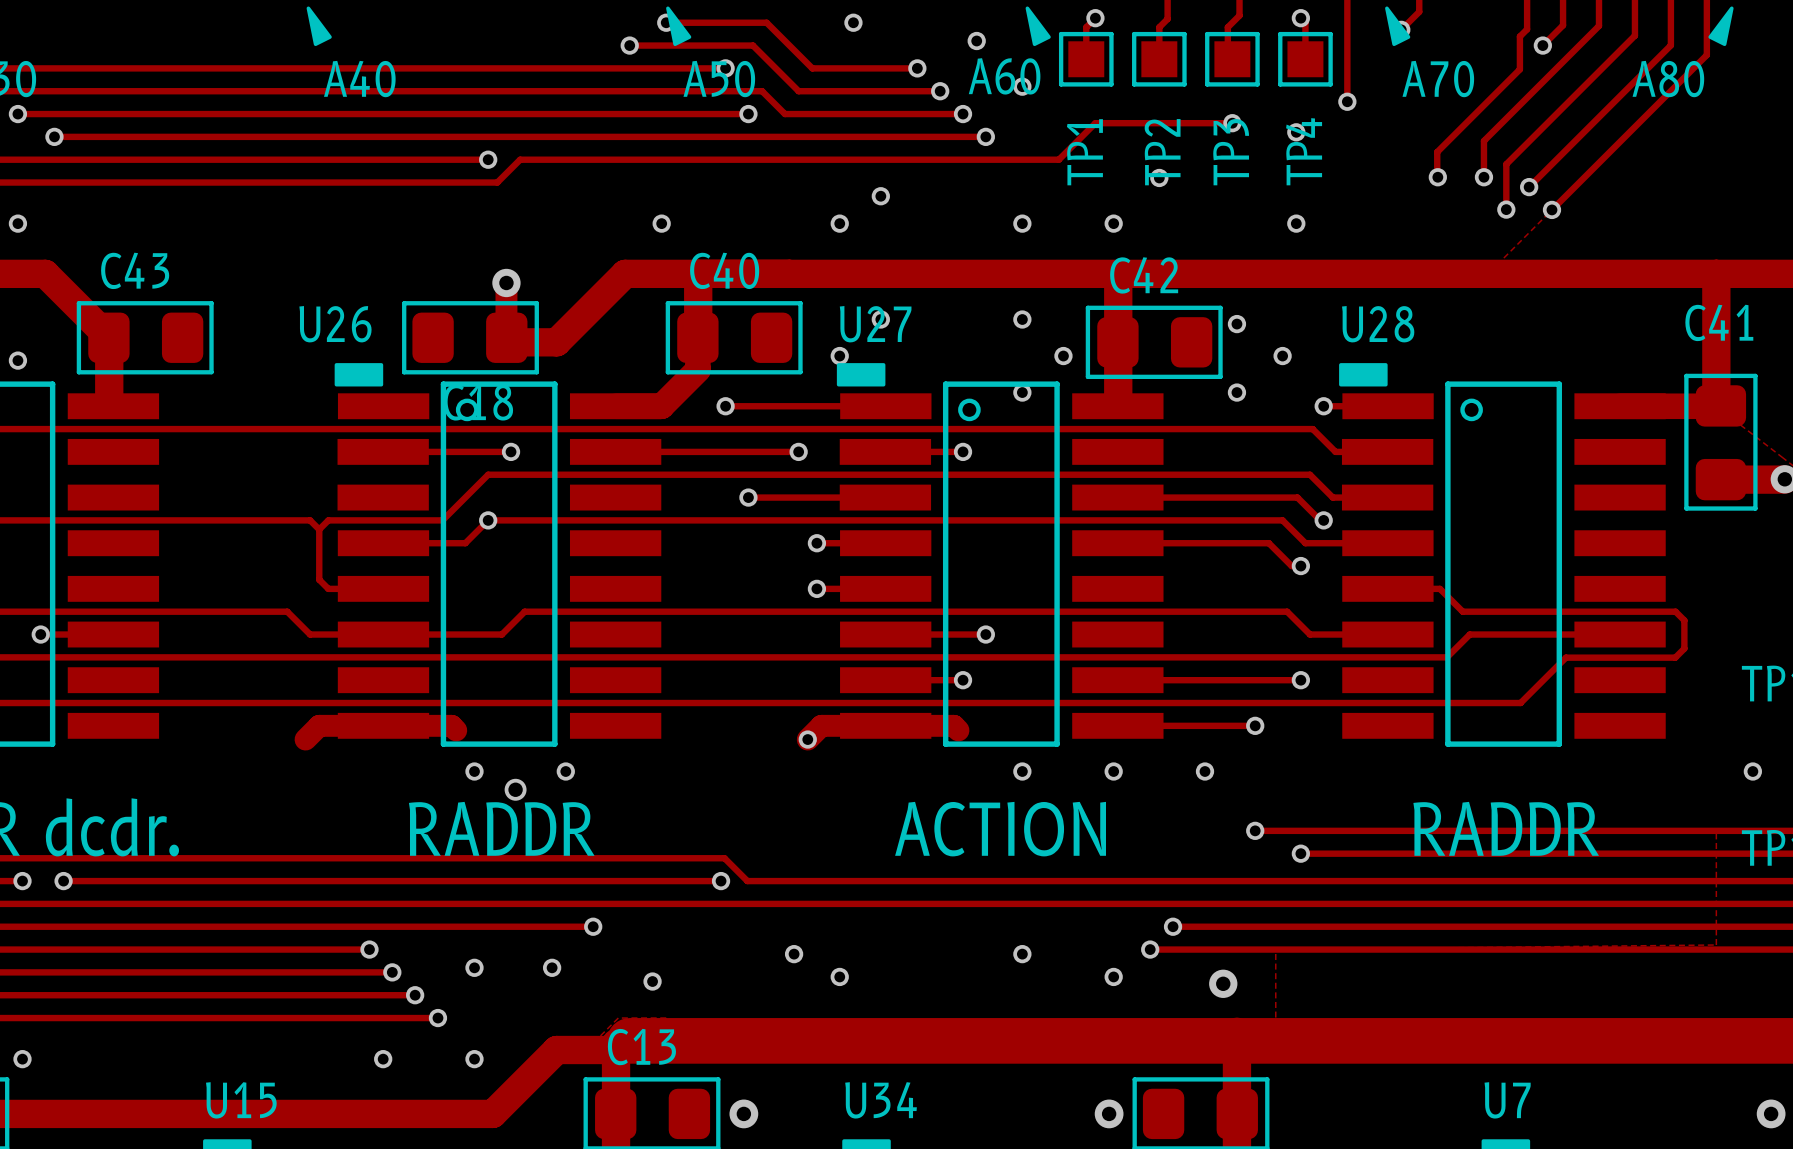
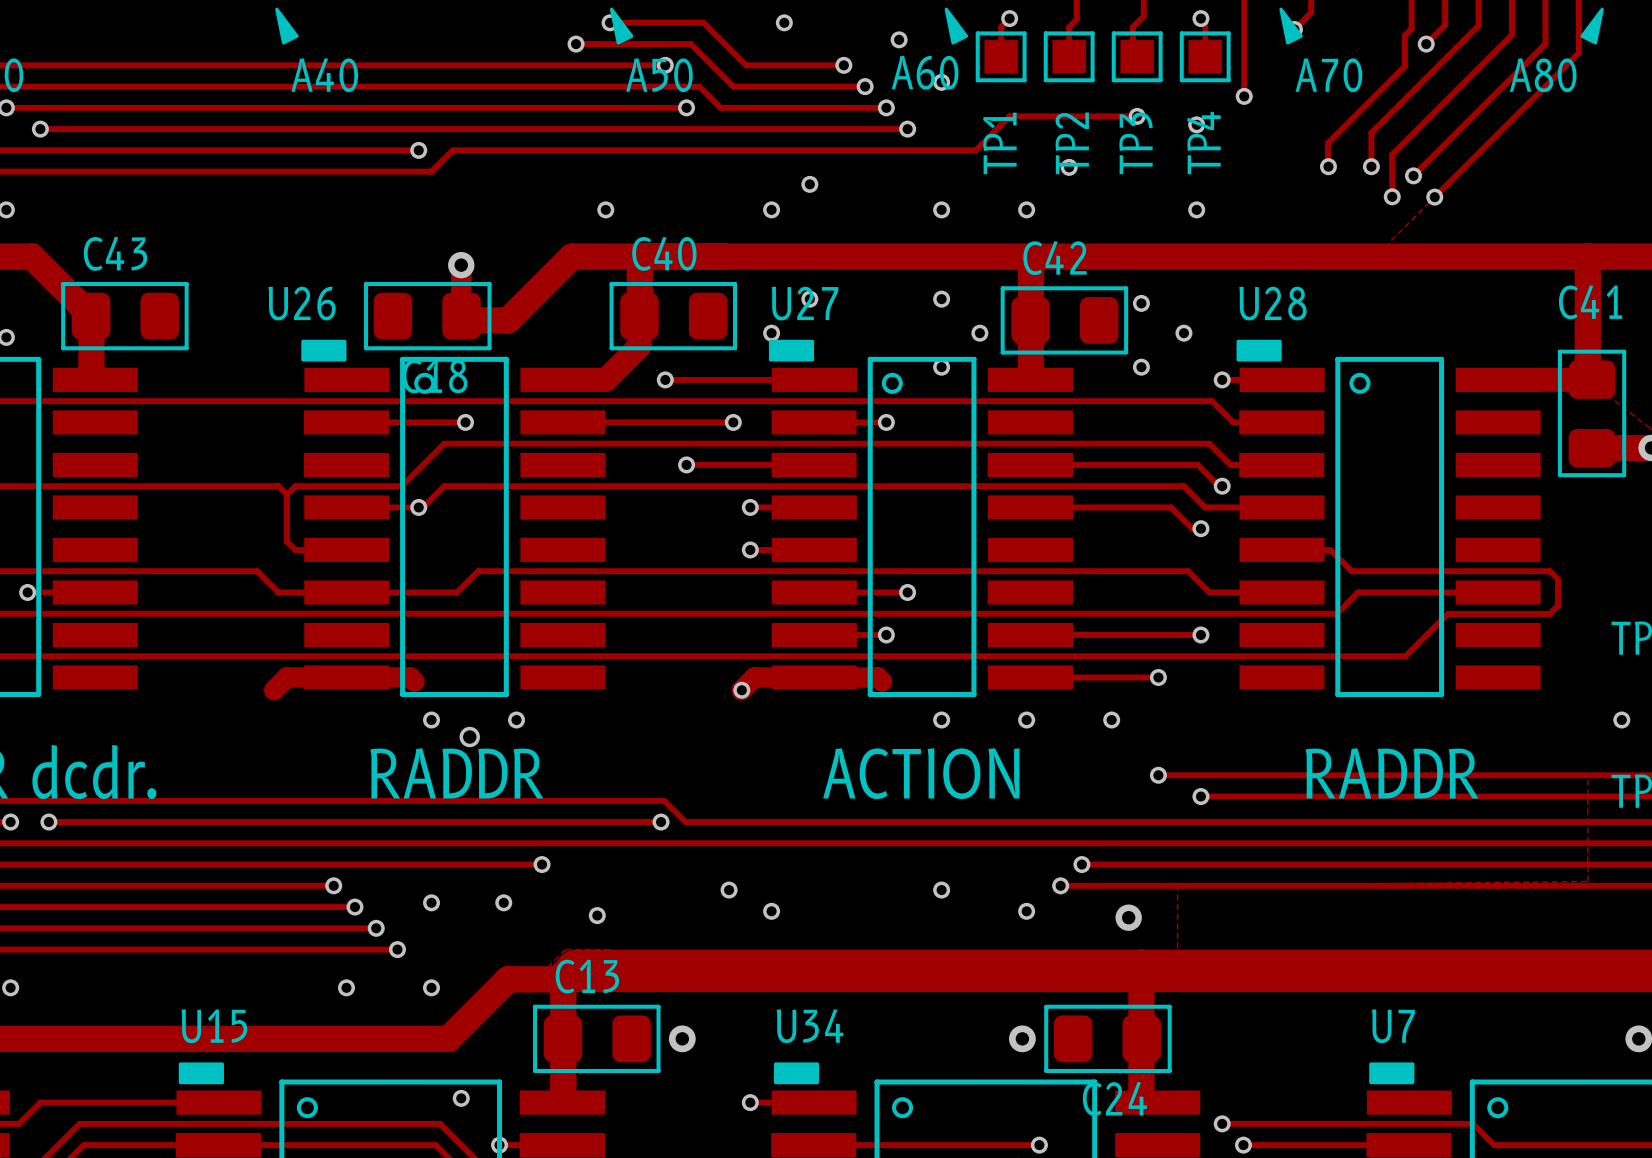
track: (460, 159) (488, 159) -> none
via position: (488, 159) -> (418, 150)
track: (520, 159) (497, 182) (474, 182) -> (474, 150) (452, 150) (431, 171)
via position: (488, 520) -> (418, 507)

